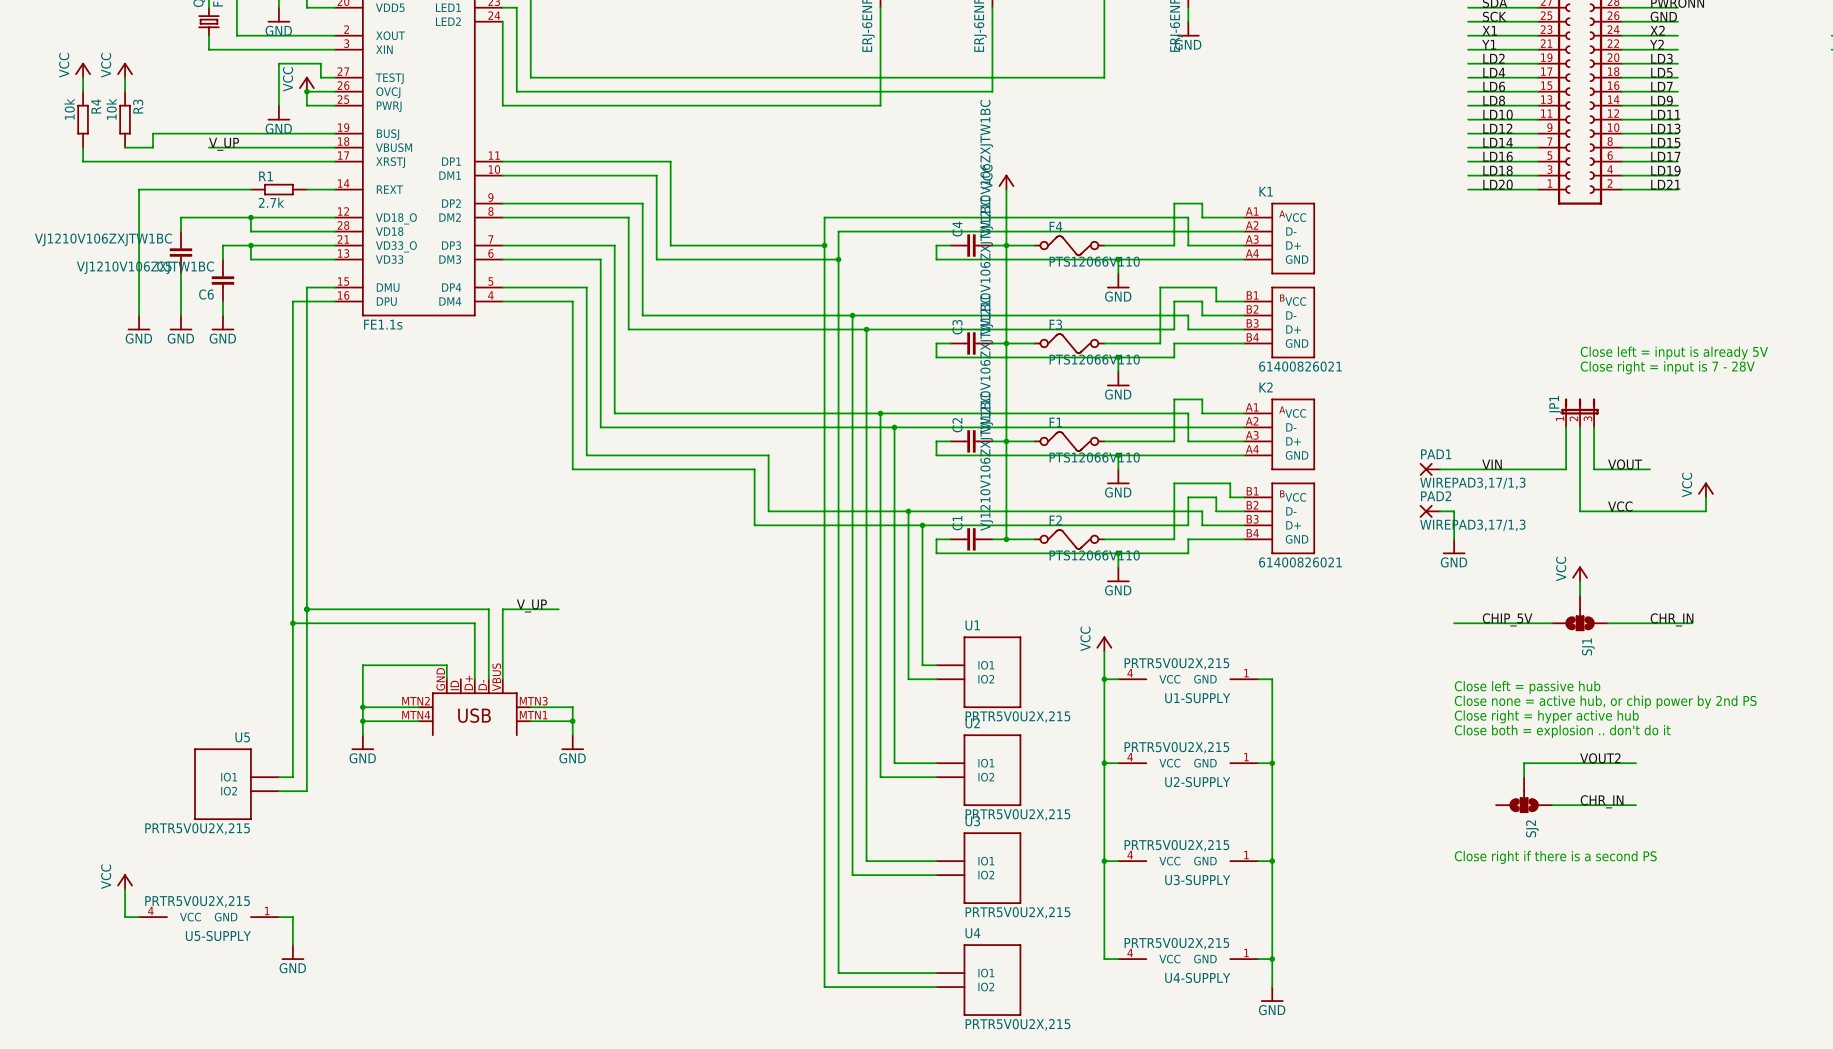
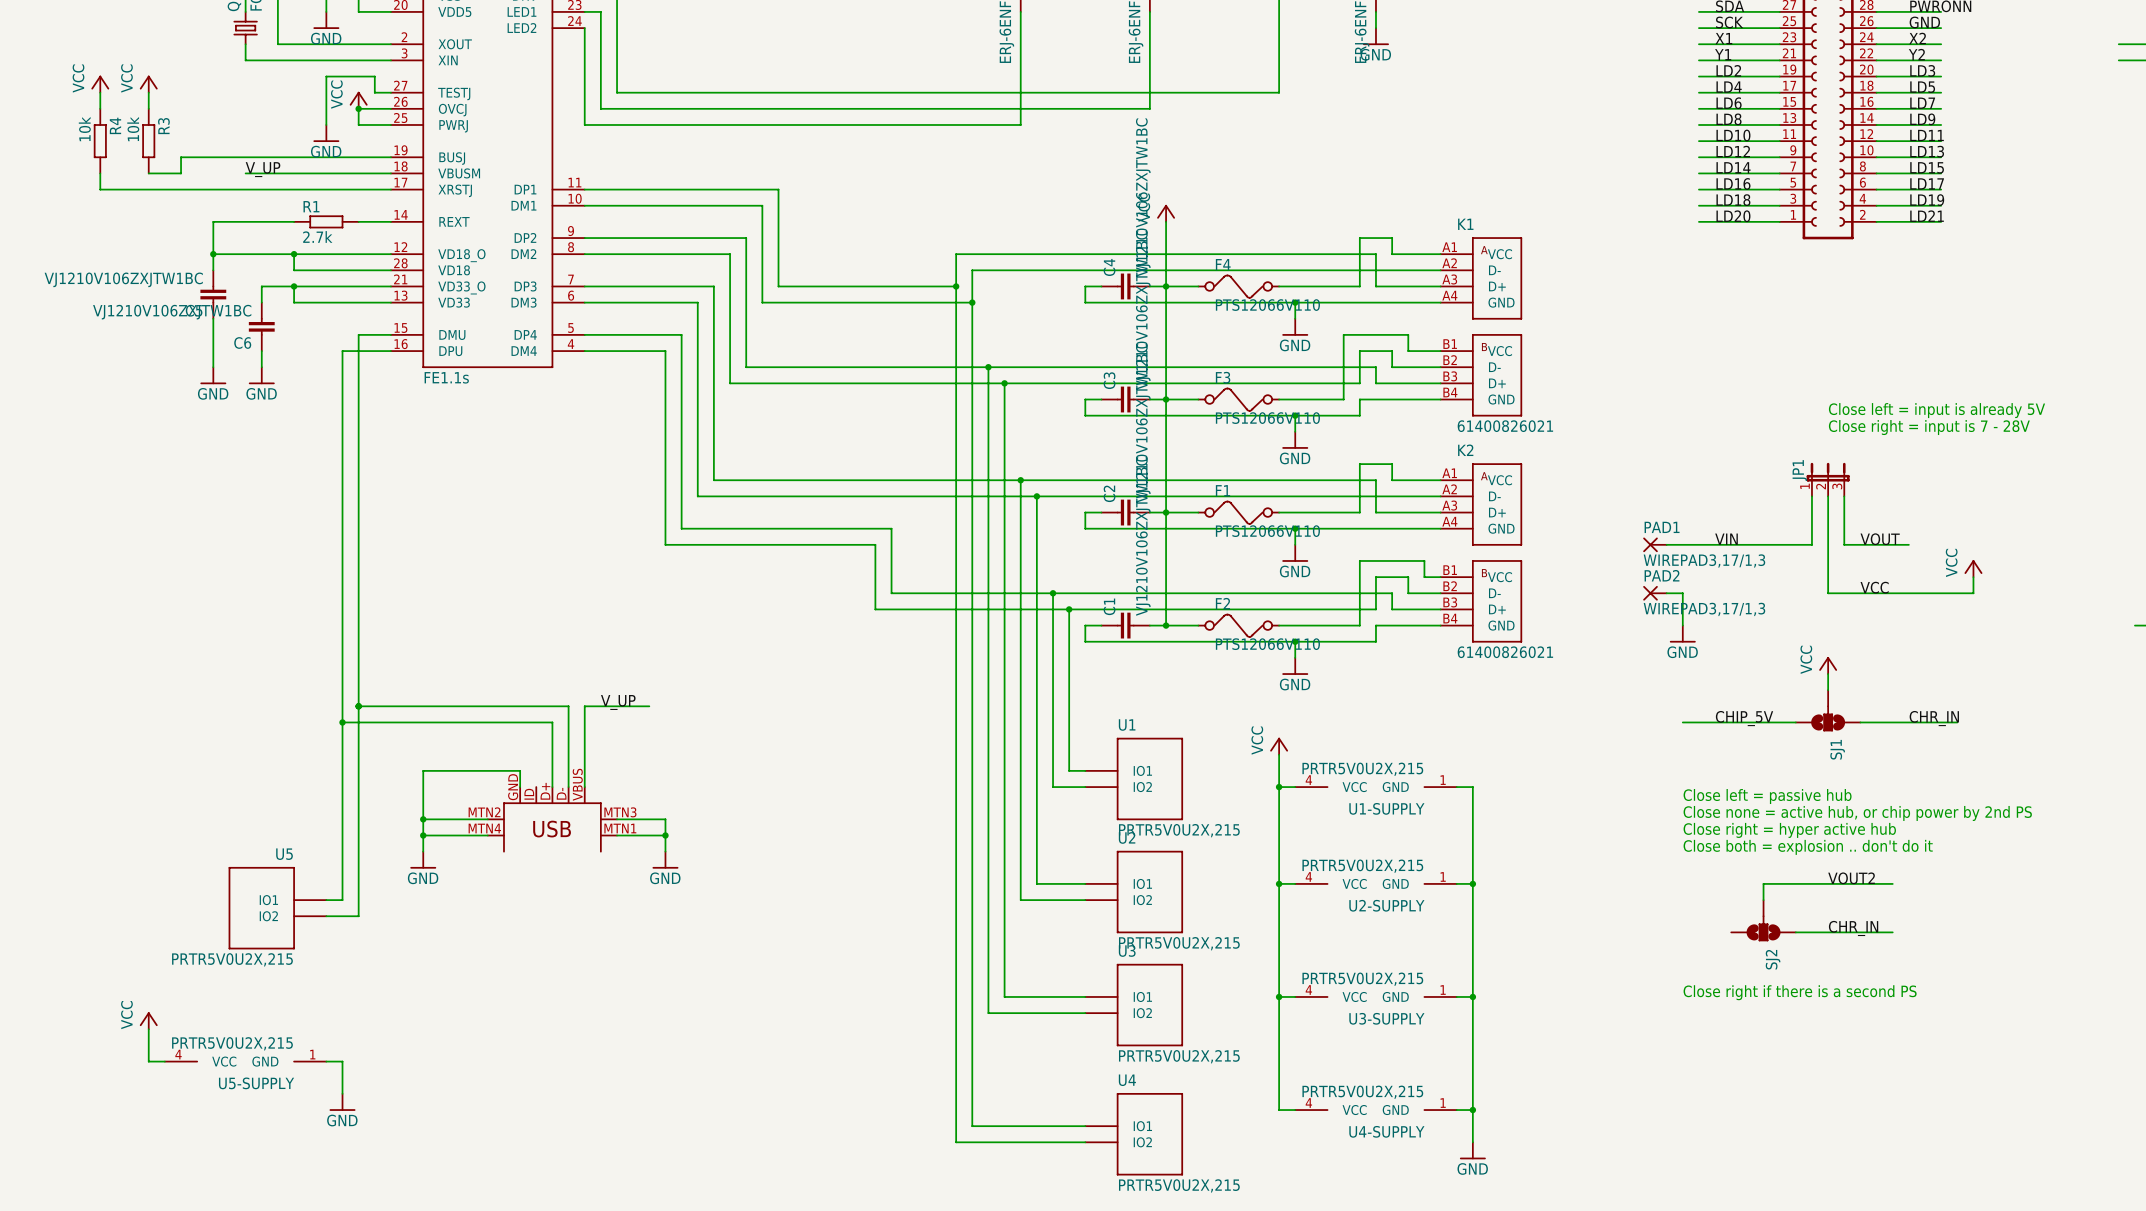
wire: (181, 189) (139, 189) (139, 315) -> (213, 221) (213, 254)
junction: none -> (213, 254)
power symbol: GND (139, 322) -> none

